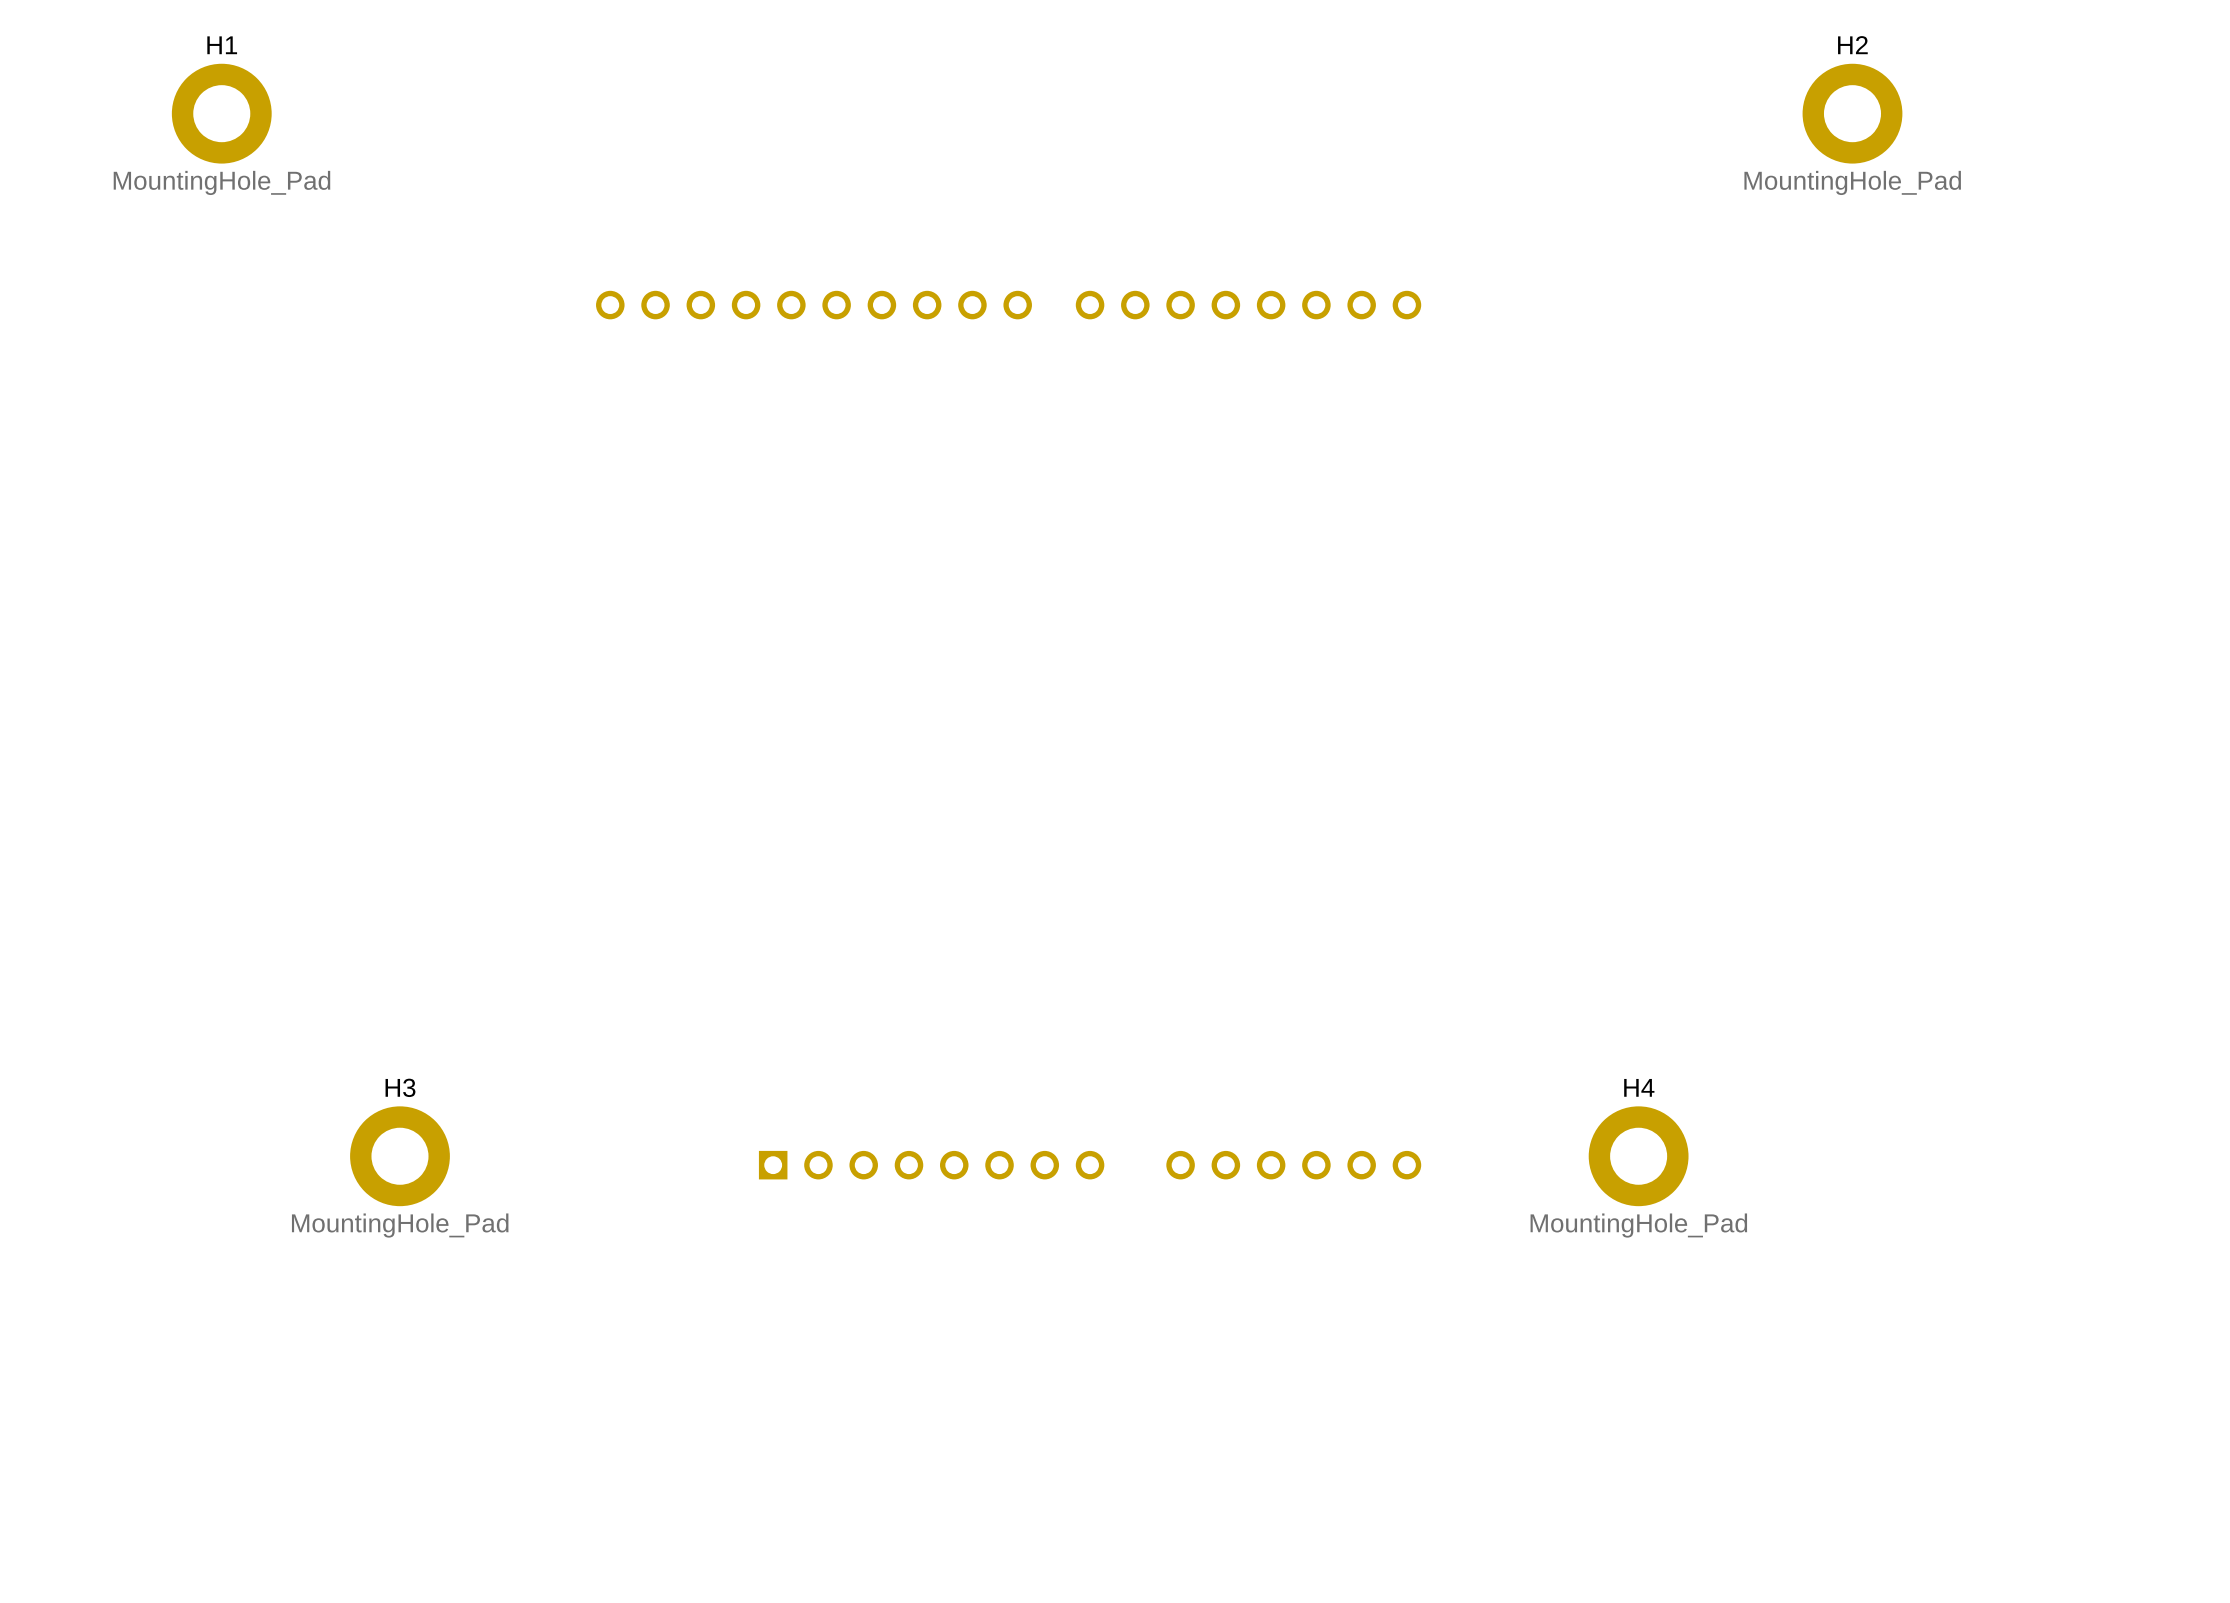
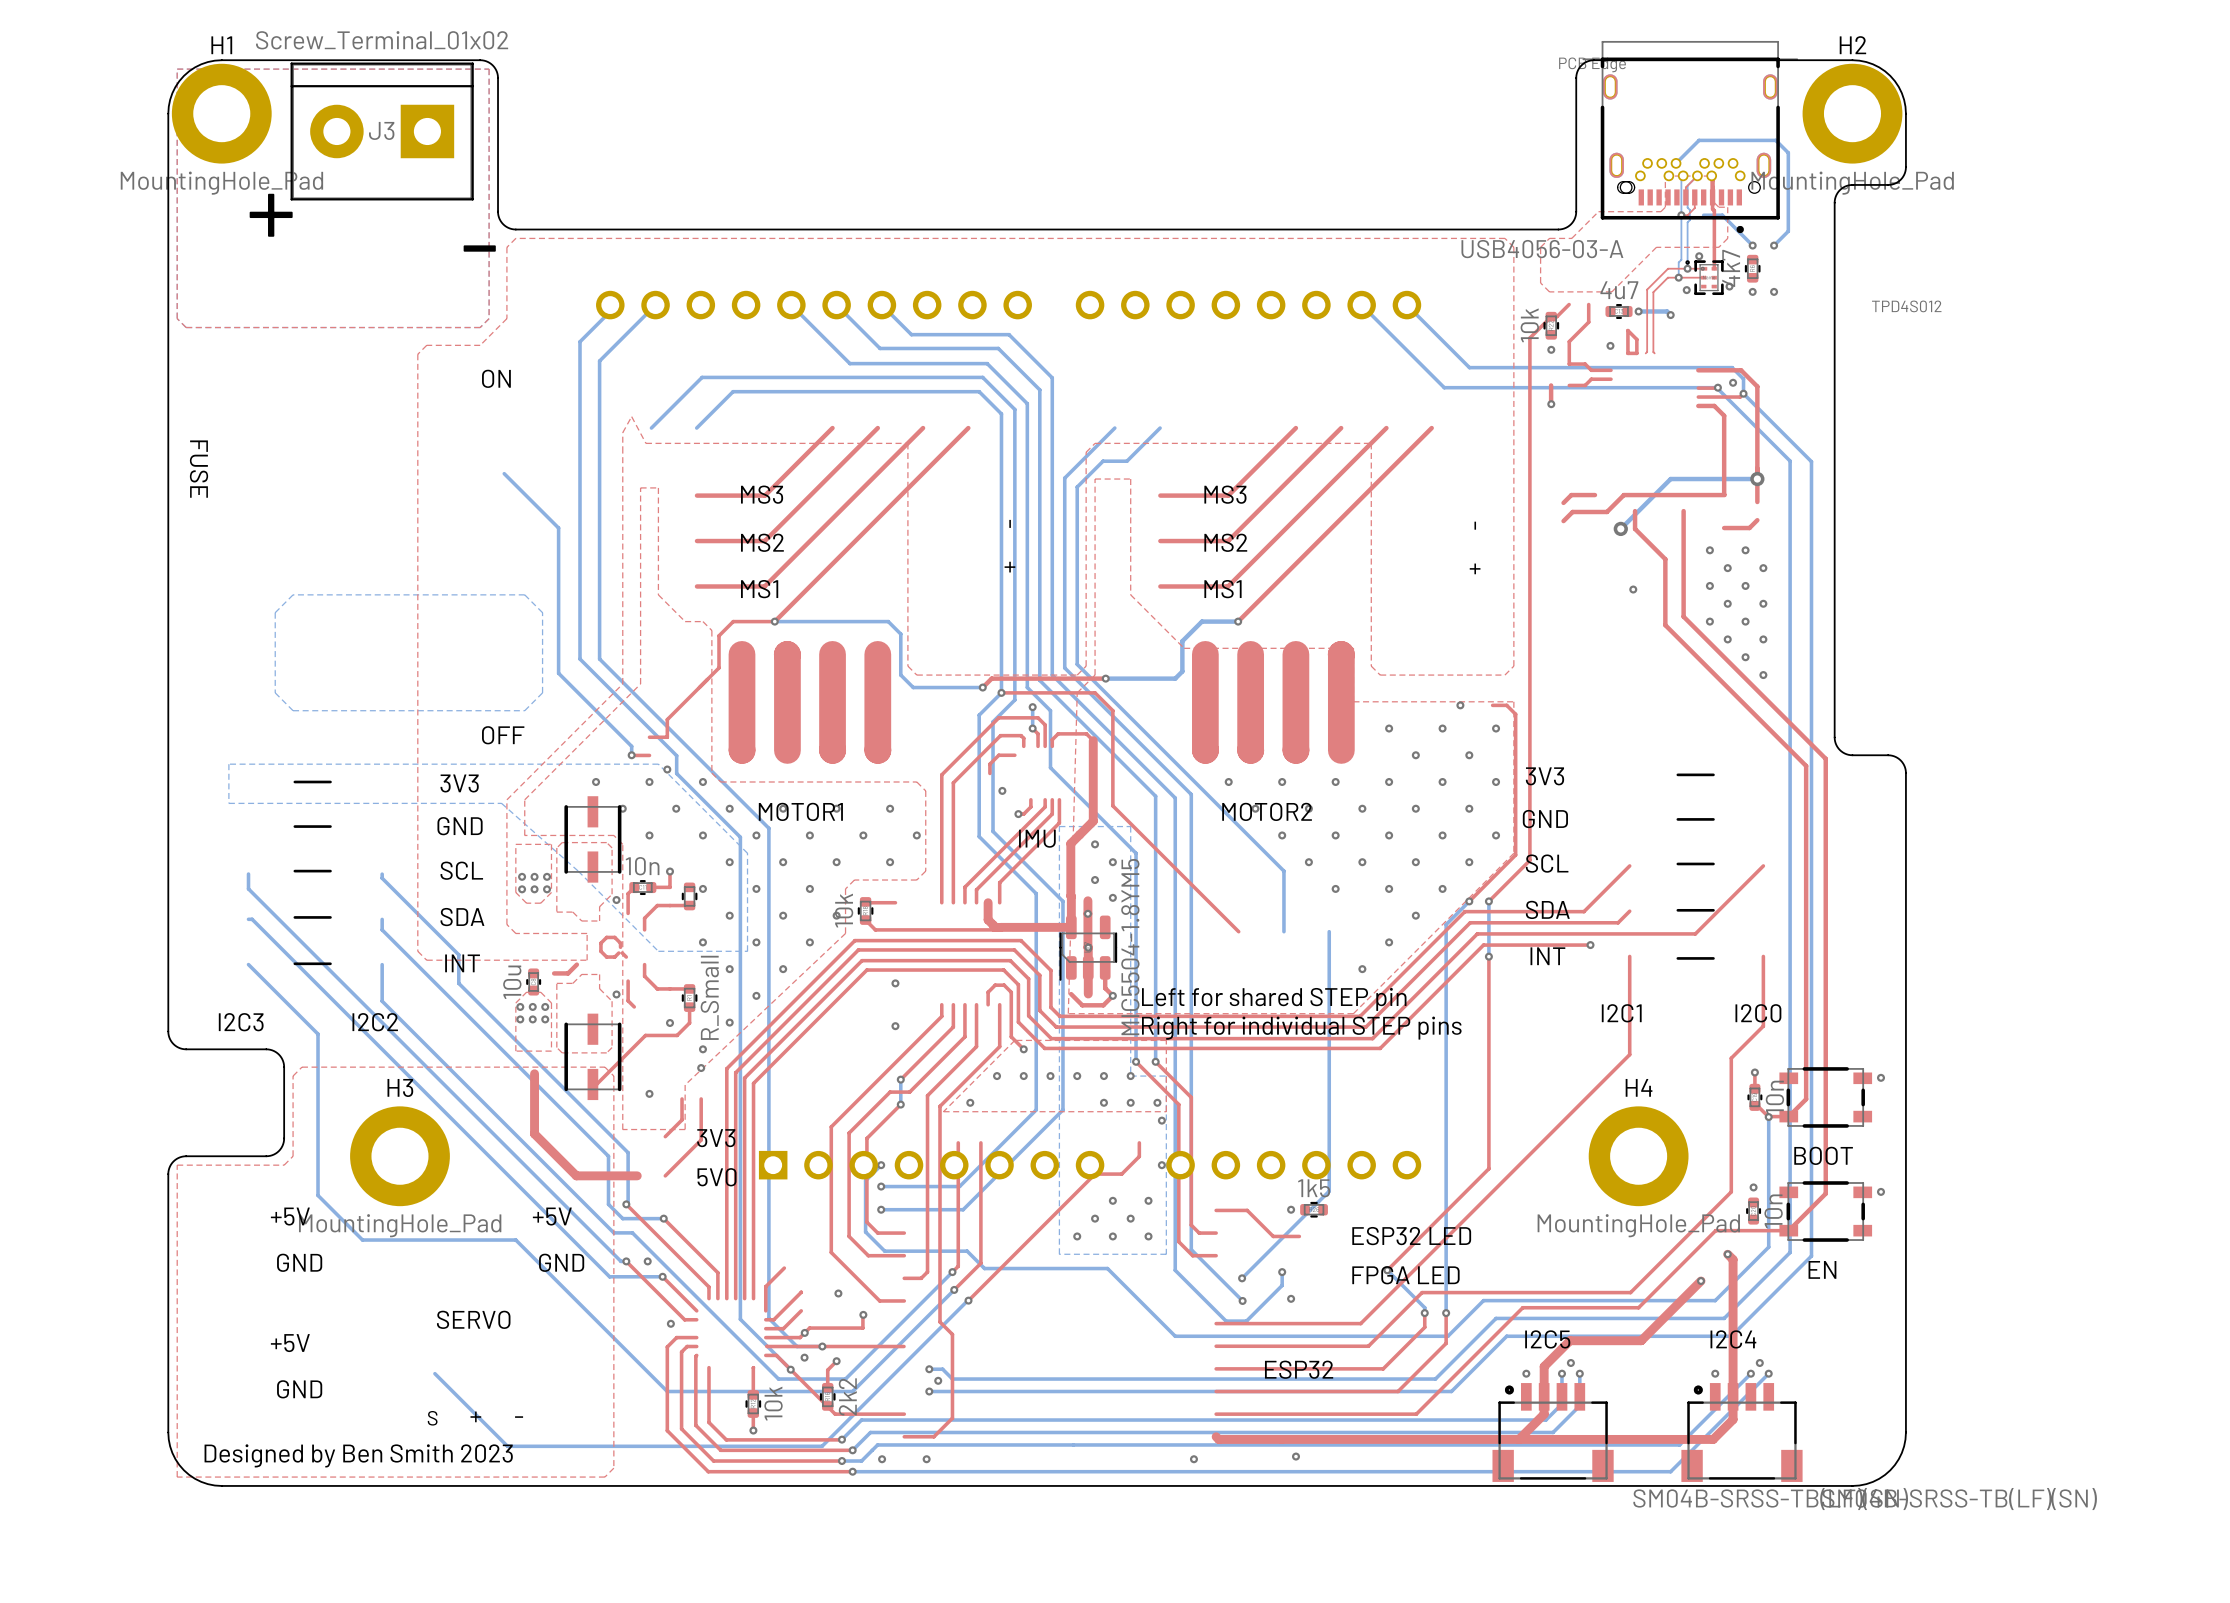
board edge: none -> (221, 60) (480, 60) (489, 62) (495, 68) (498, 78) (498, 213) (504, 225) (515, 229) (1560, 229) (1571, 224) (1576, 213) (1576, 76) (1580, 66) (1586, 61) (1594, 60) (1852, 60) (1866, 62) (1885, 71) (1898, 86) (1905, 106) (1904, 173) (1900, 179) (1892, 184) (1846, 185) (1838, 191) (1834, 200) (1834, 737) (1837, 746) (1844, 753) (1892, 755) (1902, 761) (1905, 771) (1905, 1432) (1904, 1446) (1894, 1465) (1885, 1474) (1872, 1481) (1852, 1485) (221, 1485) (201, 1481) (189, 1474) (175, 1459) (168, 1439) (168, 1170) (175, 1160) (184, 1156) (270, 1155) (280, 1149) (284, 1138) (284, 1065) (278, 1054) (268, 1049) (182, 1048) (172, 1042) (168, 1033) (168, 113) (172, 93) (183, 75) (201, 64) (221, 60)
top zone outline: none -> (177, 69) (177, 318) (186, 327) (480, 327) (489, 318) (489, 69) (177, 69)
J3: none -> Screw_Terminal_01x02 (382, 131)
part: none -> USB4056-03-A (1690, 137)
bottom track: none -> (1676, 163) (1699, 140) (1775, 140) (1788, 152) (1788, 231) (1774, 245)
bottom track: none -> (1683, 175) (1681, 177) (1681, 259) (1678, 262) (1678, 277)
top track: none -> (1697, 175) (1685, 187) (1685, 197)
bottom track: none -> (1697, 175) (1687, 185) (1689, 220) (1687, 222) (1687, 268)
top track: none -> (1711, 175) (1712, 209) (1714, 210) (1714, 268)
top zone outline: none -> (1665, 176) (1665, 207) (1660, 211) (1598, 211) (1571, 238) (1549, 238) (1540, 247) (1540, 282) (1549, 291) (1611, 291) (1656, 247) (1718, 247) (1727, 238) (1727, 207) (1718, 207) (1714, 202) (1714, 176) (1665, 176)
top track: none -> (1694, 197) (1694, 208) (1687, 215) (1681, 215)
via: none -> (1681, 215)
bottom track: none -> (1703, 215) (1722, 215) (1752, 245)
text: none -> + (271, 215)
top zone outline: none -> (515, 238) (1504, 238) (1513, 247) (1513, 666) (1504, 675) (1380, 675) (1371, 666) (1371, 443) (1095, 443) (1086, 452) (1086, 666) (1077, 675) (916, 675) (907, 666) (907, 443) (645, 443) (631, 416) (622, 432) (622, 683) (506, 799) (506, 924) (515, 933) (587, 933) (587, 960) (426, 960) (417, 951) (417, 354) (426, 345) (480, 345) (506, 318) (506, 247) (515, 238)
text: none -> - (479, 248)
via: none -> (1752, 245)
via: none -> (1774, 245)
via: none -> (1699, 256)
via: none -> (1687, 268)
top track: none -> (1704, 268) (1668, 268) (1647, 289) (1645, 353)
part: none -> 4k7 (1752, 268)
via: none -> (1678, 277)
top track: none -> (1703, 277) (1667, 277) (1653, 292) (1654, 353)
part: none -> TPD4S012 (1704, 277)
via: none -> (1729, 286)
via: none -> (1686, 290)
via: none -> (1752, 291)
via: none -> (1774, 291)
top track: none -> (1569, 304) (1556, 316) (1551, 316) (1529, 338) (1529, 860) (1488, 901)
top track: none -> (1588, 304) (1588, 322) (1569, 341) (1569, 364) (1585, 364) (1591, 370) (1610, 370)
bottom track: none -> (610, 305) (610, 311) (579, 341) (579, 659) (676, 755) (676, 773) (740, 837) (740, 1319) (790, 1369)
bottom track: none -> (655, 305) (599, 361) (599, 659) (768, 828) (768, 1318) (796, 1346) (822, 1346)
bottom track: none -> (791, 305) (849, 363) (987, 363) (1027, 403) (1027, 687) (1050, 710) (1050, 767) (1136, 853) (1136, 1061)
bottom track: none -> (836, 305) (880, 348) (998, 348) (1039, 389) (1039, 680) (1155, 796) (1155, 1061)
bottom track: none -> (881, 305) (911, 334) (1009, 334) (1052, 377) (1052, 675) (1175, 798) (1175, 1270) (1226, 1321) (1246, 1321) (1282, 1285) (1282, 1272)
bottom track: none -> (1361, 305) (1444, 387) (1717, 387) (1790, 461) (1790, 1252) (1724, 1318) (1496, 1318) (1435, 1379) (952, 1379) (942, 1369) (929, 1369)
bottom track: none -> (1406, 305) (1469, 367) (1732, 367) (1743, 378) (1743, 393) (1811, 461) (1811, 1256) (1731, 1336) (1506, 1336) (1451, 1391) (929, 1391)
part: none -> 4u7 (1619, 311)
bottom track: none -> (1638, 311) (1667, 311) (1670, 315)
via: none -> (1638, 311)
via: none -> (1670, 315)
part: none -> 10k (1551, 325)
top track: none -> (1627, 330) (1636, 339) (1636, 353) (1627, 353) (1627, 330)
via: none -> (1610, 345)
via: none -> (1551, 349)
top track: none -> (1698, 370) (1741, 370) (1757, 386) (1757, 502)
text: none -> ON (496, 378)
top track: none -> (1610, 379) (1591, 379) (1585, 385) (1569, 385)
via: none -> (1733, 382)
top track: none -> (1551, 385) (1551, 403)
top track: none -> (1717, 387) (1698, 388)
via: none -> (1717, 387)
top track: none -> (1743, 393) (1740, 397) (1698, 397)
via: none -> (1743, 393)
via: none -> (1551, 404)
top track: none -> (1698, 405) (1714, 405) (1724, 415) (1724, 494)
bottom track: none -> (651, 428) (702, 377) (982, 377) (1014, 409) (1014, 700) (993, 721) (993, 831) (1062, 901) (1062, 1109) (963, 1209) (881, 1209)
bottom track: none -> (696, 428) (733, 391) (979, 391) (1001, 413) (1001, 692) (979, 715) (979, 836) (1036, 893) (1036, 1109) (959, 1186) (881, 1186)
top track: none -> (832, 428) (764, 495) (696, 495)
top track: none -> (877, 428) (764, 541) (696, 541)
top track: none -> (923, 428) (764, 586) (696, 586)
top track: none -> (968, 428) (774, 621) (733, 621) (719, 635) (719, 667) (667, 719) (667, 737) (649, 737)
bottom track: none -> (1114, 428) (1064, 478) (1064, 667) (1191, 794) (1191, 1249) (1242, 1300)
bottom track: none -> (1160, 428) (1126, 461) (1103, 461) (1077, 487) (1077, 664) (1283, 871) (1283, 931)
top track: none -> (1295, 428) (1228, 495) (1160, 495)
top track: none -> (1341, 428) (1228, 541) (1160, 541)
top track: none -> (1386, 428) (1228, 586) (1160, 586)
top track: none -> (1431, 428) (1238, 621)
text: none -> FUSE (199, 469)
bottom track: none -> (504, 473) (558, 528) (558, 673) (631, 746) (631, 755)
top zone outline: none -> (1095, 479) (1130, 479) (1130, 594) (1184, 648) (1353, 648) (1353, 701) (1513, 701) (1513, 853) (1353, 1013) (1068, 1013) (1077, 692) (1095, 675) (1095, 479)
bottom track: none -> (1757, 479) (1670, 479) (1620, 528)
via: none -> (1757, 479)
top zone outline: none -> (640, 487) (640, 683) (524, 799) (524, 835) (613, 835) (622, 844) (622, 1129) (685, 1129) (685, 1084) (845, 933) (845, 888) (854, 880) (916, 880) (925, 871) (925, 790) (916, 781) (720, 781) (711, 773) (711, 630) (702, 621) (685, 621) (658, 594) (658, 487) (640, 487)
text: none -> MS3 (762, 494)
text: none -> MS3 (1225, 494)
top track: none -> (1594, 495) (1571, 495) (1563, 502)
top track: none -> (1724, 495) (1623, 495) (1606, 511) (1572, 511) (1563, 521)
top track: none -> (1635, 511) (1635, 528) (1665, 559) (1665, 625) (1806, 765) (1806, 1099) (1788, 1116) (1768, 1117) (1757, 1105) (1754, 1105)
top track: none -> (1683, 511) (1683, 616) (1825, 758) (1825, 1193) (1788, 1230) (1715, 1230) (1638, 1307) (1522, 1307) (1416, 1414) (1216, 1414)
top track: none -> (1757, 520) (1749, 528) (1724, 528)
text: none -> - (1010, 523)
text: none -> - (1475, 525)
via: none -> (1620, 528)
text: none -> MS2 (762, 542)
text: none -> MS2 (1225, 542)
via: none -> (1709, 550)
via: none -> (1745, 550)
text: none -> + (1009, 567)
text: none -> + (1475, 568)
via: none -> (1727, 568)
via: none -> (1763, 568)
via: none -> (1709, 585)
via: none -> (1745, 585)
text: none -> MS1 (759, 589)
text: none -> MS1 (1222, 589)
via: none -> (1633, 589)
bottom zone outline: none -> (293, 594) (524, 594) (542, 612) (542, 692) (524, 710) (293, 710) (275, 692) (275, 612) (293, 594)
via: none -> (1727, 603)
via: none -> (1763, 603)
bottom track: none -> (774, 621) (888, 621) (900, 634) (900, 675) (913, 687) (982, 687)
via: none -> (774, 621)
bottom track: none -> (1238, 621) (1201, 621) (1182, 641) (1182, 671) (1175, 678) (1105, 678)
via: none -> (1238, 621)
via: none -> (1709, 621)
via: none -> (1745, 621)
via: none -> (1727, 639)
via: none -> (1763, 639)
top track: none -> (741, 654) (741, 750)
top track: none -> (787, 654) (787, 750)
top track: none -> (832, 654) (832, 750)
top track: none -> (877, 654) (877, 750)
top track: none -> (1205, 654) (1205, 750)
top track: none -> (1250, 654) (1250, 750)
top track: none -> (1295, 654) (1295, 750)
top track: none -> (1341, 654) (1341, 750)
via: none -> (1745, 657)
via: none -> (1763, 675)
top track: none -> (1105, 678) (991, 678) (982, 687)
via: none -> (1105, 678)
via: none -> (982, 687)
top track: none -> (1001, 692) (1095, 692) (1112, 710) (1112, 805) (1238, 931)
via: none -> (1001, 692)
via: none -> (1460, 705)
top track: none -> (1492, 705) (1506, 705) (1515, 714) (1515, 855) (1469, 901)
bottom track: none -> (1032, 707) (1032, 728)
via: none -> (1032, 707)
top track: none -> (1032, 728) (1038, 733) (1038, 746)
via: none -> (1032, 728)
via: none -> (1389, 728)
via: none -> (1442, 728)
via: none -> (1496, 728)
text: none -> OFF (503, 735)
top track: none -> (1023, 746) (1023, 738) (1021, 735) (1000, 735) (953, 782) (953, 902)
top track: none -> (1045, 746) (1045, 724) (1038, 717) (998, 717) (941, 774) (941, 902)
top track: none -> (1052, 746) (1052, 739) (1058, 733) (1086, 733) (1093, 740) (1093, 821) (1070, 843) (1071, 927) (995, 927) (988, 919) (988, 902)
top track: none -> (631, 755) (649, 755)
via: none -> (631, 755)
top track: none -> (1014, 755) (998, 755) (989, 764) (989, 773)
via: none -> (1415, 755)
via: none -> (1469, 755)
bottom zone outline: none -> (228, 764) (658, 764) (747, 853) (747, 951) (658, 951) (578, 871) (501, 803) (228, 803) (228, 764)
via: none -> (667, 769)
line: none -> (1677, 774) (1713, 774)
text: none -> 3V3 (1544, 776)
line: none -> (294, 781) (330, 781)
via: none -> (596, 781)
via: none -> (649, 781)
via: none -> (702, 781)
via: none -> (1228, 781)
via: none -> (1282, 781)
via: none -> (1335, 781)
via: none -> (1389, 781)
via: none -> (1442, 781)
via: none -> (1496, 781)
text: none -> 3V3 (459, 783)
via: none -> (1002, 790)
top track: none -> (1030, 799) (1030, 806) (1023, 814) (1018, 814)
top track: none -> (1045, 799) (1045, 806) (964, 887) (964, 902)
top track: none -> (1052, 799) (1052, 814) (976, 889) (976, 902)
top track: none -> (1059, 799) (1059, 822) (999, 882) (999, 902)
via: none -> (622, 808)
via: none -> (676, 808)
via: none -> (729, 808)
via: none -> (783, 808)
via: none -> (836, 808)
via: none -> (890, 808)
via: none -> (1255, 808)
via: none -> (1308, 808)
via: none -> (1362, 808)
via: none -> (1415, 808)
via: none -> (1469, 808)
text: none -> MOTOR1 (800, 811)
text: none -> MOTOR2 (1267, 811)
via: none -> (1018, 814)
text: none -> GND (1545, 819)
line: none -> (1677, 819) (1713, 819)
line: none -> (294, 826) (330, 826)
text: none -> GND (460, 826)
bottom zone outline: none -> (1059, 826) (1130, 826) (1130, 1076) (1166, 1076) (1166, 1254) (1059, 1254) (1059, 826)
via: none -> (649, 835)
via: none -> (702, 835)
via: none -> (756, 835)
via: none -> (809, 835)
via: none -> (863, 835)
via: none -> (916, 835)
via: none -> (1282, 835)
via: none -> (1335, 835)
via: none -> (1389, 835)
via: none -> (1442, 835)
via: none -> (1496, 835)
text: none -> IMU (1037, 838)
part: none -> (592, 839)
top zone outline: none -> (562, 842) (606, 842) (612, 847) (612, 894) (599, 906) (599, 921) (581, 921) (572, 912) (556, 912) (556, 847) (562, 842)
top zone outline: none -> (515, 844) (515, 892) (526, 903) (540, 903) (551, 892) (551, 844) (515, 844)
via: none -> (1095, 844)
via: none -> (729, 862)
via: none -> (783, 862)
via: none -> (836, 862)
via: none -> (890, 862)
via: none -> (1112, 862)
via: none -> (1308, 862)
via: none -> (1362, 862)
via: none -> (1415, 862)
via: none -> (1469, 862)
text: none -> SCL (1547, 863)
line: none -> (1677, 863) (1713, 863)
top track: none -> (1629, 865) (1583, 911) (1464, 911) (1360, 1016) (1059, 1016) (1050, 1007) (1050, 970) (1021, 940) (854, 940) (726, 1068) (726, 1298)
top track: none -> (1763, 865) (1695, 933) (1477, 933) (1372, 1038) (1051, 1038) (1028, 1015) (1028, 978) (1010, 960) (862, 960) (744, 1078) (744, 1298)
text: none -> SCL (461, 870)
line: none -> (294, 871) (330, 871)
top track: none -> (669, 871) (669, 887) (651, 887)
via: none -> (669, 871)
bottom track: none -> (248, 874) (248, 888) (620, 1261) (626, 1261)
bottom track: none -> (382, 874) (382, 878) (458, 954) (458, 983) (628, 1152) (628, 1202) (626, 1204)
via: none -> (522, 876)
via: none -> (534, 876)
via: none -> (547, 876)
via: none -> (1095, 880)
top track: none -> (634, 887) (628, 893) (628, 913)
part: none -> 10n (642, 887)
via: none -> (702, 888)
via: none -> (756, 888)
via: none -> (809, 888)
via: none -> (1335, 888)
via: none -> (1389, 888)
via: none -> (1442, 888)
via: none -> (522, 889)
via: none -> (534, 889)
via: none -> (547, 889)
part: none -> (689, 896)
via: none -> (1112, 897)
via: none -> (616, 900)
top track: none -> (1087, 900) (1088, 993)
bottom track: none -> (1469, 901) (1446, 924) (1446, 1313)
via: none -> (1469, 901)
bottom track: none -> (1488, 901) (1488, 956)
via: none -> (1488, 901)
top track: none -> (868, 902) (895, 902)
top track: none -> (689, 905) (657, 905) (644, 918) (644, 929)
text: none -> SDA (1547, 909)
part: none -> 10k (865, 910)
line: none -> (1677, 910) (1713, 910)
top track: none -> (1629, 911) (1618, 922) (1470, 922) (1365, 1027) (1056, 1027) (1039, 1010) (1039, 975) (1014, 949) (858, 949) (735, 1072) (735, 1298)
via: none -> (1087, 913)
via: none -> (729, 915)
via: none -> (783, 915)
via: none -> (836, 915)
via: none -> (1415, 915)
line: none -> (294, 917) (330, 917)
text: none -> SDA (462, 917)
bottom track: none -> (248, 919) (252, 919) (609, 1276) (662, 1276)
bottom track: none -> (382, 919) (382, 929) (608, 1156) (608, 1204) (622, 1218) (663, 1218)
top track: none -> (865, 920) (875, 929) (993, 929) (993, 924)
bottom track: none -> (1329, 931) (1329, 1191) (1242, 1278)
via: none -> (702, 942)
via: none -> (756, 942)
via: none -> (809, 942)
via: none -> (1389, 942)
top track: none -> (1590, 945) (1483, 945) (1380, 1048) (1044, 1048) (1018, 1022) (1018, 984) (1003, 970) (866, 970) (753, 1083) (753, 1298)
via: none -> (1590, 945)
top track: none -> (620, 947) (620, 943) (614, 937) (606, 937) (600, 943) (600, 951) (606, 957) (614, 957) (618, 953)
via: none -> (1088, 947)
part: none -> MIC5504-1.8YM5 (1088, 948)
top track: none -> (622, 953) (626, 957)
top track: none -> (1488, 956) (1488, 1168) (1387, 1270)
via: none -> (1488, 956)
text: none -> INT (1547, 956)
top track: none -> (1629, 956) (1629, 1054) (1360, 1323) (1216, 1323)
top track: none -> (1763, 956) (1763, 1026) (1731, 1058) (1731, 1191) (1630, 1292) (1422, 1292) (1368, 1346) (1216, 1346)
line: none -> (1677, 958) (1713, 958)
line: none -> (294, 963) (330, 963)
text: none -> INT (462, 963)
bottom track: none -> (248, 964) (318, 1034) (318, 1195) (362, 1240) (515, 1240) (667, 1391) (852, 1391) (954, 1289)
bottom track: none -> (382, 964) (382, 1001) (613, 1232) (632, 1232) (778, 1379) (845, 1379) (952, 1272)
top track: none -> (576, 964) (568, 973) (554, 973)
top track: none -> (644, 964) (644, 976) (657, 988) (689, 988)
top track: none -> (1105, 967) (1105, 988) (1112, 995) (1103, 1005) (1082, 1005) (1071, 994)
via: none -> (729, 969)
via: none -> (783, 969)
via: none -> (1362, 969)
top zone outline: none -> (581, 974) (572, 983) (556, 983) (556, 1047) (562, 1052) (606, 1052) (612, 1047) (612, 1001) (599, 988) (599, 974) (581, 974)
top track: none -> (628, 981) (628, 1000) (634, 1006)
part: none -> 10u (533, 982)
via: none -> (895, 983)
top zone outline: none -> (526, 992) (515, 1002) (515, 1051) (551, 1051) (551, 1002) (540, 992) (526, 992)
via: none -> (616, 994)
via: none -> (756, 995)
via: none -> (1112, 995)
part: none -> R_Small (689, 998)
text: none -> Left for shared STEP pin (1274, 999)
top track: none -> (941, 1004) (941, 1016) (831, 1126) (831, 1252) (879, 1300) (904, 1300)
top track: none -> (953, 1004) (953, 1027) (900, 1079)
top track: none -> (964, 1004) (964, 1036) (909, 1092) (890, 1092) (849, 1133) (849, 1236) (868, 1255) (904, 1255)
top track: none -> (976, 1004) (976, 1046) (927, 1095) (927, 1272) (921, 1278) (904, 1278)
top track: none -> (988, 1004) (988, 992) (995, 985) (1004, 985) (1011, 992) (1011, 1036) (1023, 1049)
top track: none -> (999, 1004) (999, 1046) (939, 1106) (939, 1322) (952, 1334) (952, 1418) (933, 1436) (904, 1436)
via: none -> (520, 1006)
via: none -> (532, 1006)
via: none -> (545, 1006)
top track: none -> (689, 1007) (689, 1022) (677, 1035) (645, 1035) (596, 1084) (592, 1084)
text: none -> I2C1 (1621, 1013)
text: none -> I2C0 (1758, 1013)
via: none -> (520, 1019)
via: none -> (532, 1019)
via: none -> (545, 1019)
text: none -> I2C3 (241, 1022)
text: none -> I2C2 (375, 1022)
via: none -> (669, 1022)
via: none -> (729, 1022)
via: none -> (895, 1026)
text: none -> Right for individual STEP pins (1301, 1028)
top zone outline: none -> (1014, 1040) (1166, 1040) (1166, 1111) (943, 1111) (1014, 1040)
via: none -> (702, 1049)
via: none -> (1023, 1049)
part: none -> (592, 1056)
top track: none -> (1136, 1061) (1178, 1104) (1178, 1241) (1192, 1255) (1216, 1255)
via: none -> (1136, 1061)
top track: none -> (1155, 1061) (1191, 1097) (1191, 1225) (1199, 1233) (1216, 1233)
via: none -> (1155, 1061)
top zone outline: none -> (301, 1067) (293, 1076) (293, 1156) (284, 1165) (177, 1165) (177, 1477) (604, 1477) (613, 1468) (613, 1076) (604, 1067) (301, 1067)
via: none -> (701, 1068)
top track: none -> (1754, 1072) (1754, 1088)
via: none -> (1754, 1072)
top track: none -> (534, 1073) (534, 1133) (576, 1175) (637, 1175)
via: none -> (997, 1076)
via: none -> (1023, 1076)
via: none -> (1050, 1076)
via: none -> (1077, 1076)
via: none -> (1103, 1076)
via: none -> (1130, 1076)
via: none -> (1881, 1077)
bottom track: none -> (900, 1079) (900, 1104)
via: none -> (900, 1079)
via: none -> (649, 1093)
part: none -> 10n (1754, 1097)
part: none -> (1825, 1097)
top track: none -> (682, 1098) (682, 1119) (665, 1136)
top track: none -> (701, 1098) (701, 1139) (665, 1175)
via: none -> (970, 1102)
via: none -> (1103, 1102)
via: none -> (1130, 1102)
via: none -> (1157, 1102)
top track: none -> (900, 1104) (866, 1138) (866, 1222) (877, 1233) (904, 1233)
via: none -> (900, 1104)
bottom track: none -> (1768, 1117) (1768, 1247) (1715, 1300) (1483, 1300) (1447, 1336) (1175, 1336) (1107, 1268) (984, 1268) (967, 1251) (884, 1251) (865, 1232) (865, 1180) (881, 1165)
via: none -> (1768, 1117)
via: none -> (1161, 1120)
text: none -> 3V3 (716, 1138)
top track: none -> (958, 1142) (958, 1266) (952, 1272)
top track: none -> (980, 1142) (980, 1263) (954, 1289)
top track: none -> (1139, 1142) (1139, 1156) (1121, 1174) (1095, 1174) (968, 1300)
text: none -> BOOT (1823, 1155)
via: none -> (881, 1165)
via: none -> (1161, 1165)
text: none -> 5V0 (717, 1177)
via: none -> (881, 1186)
via: none -> (1753, 1187)
via: none -> (1881, 1191)
via: none -> (1112, 1200)
via: none -> (1148, 1200)
top track: none -> (626, 1204) (708, 1287) (708, 1298)
via: none -> (626, 1204)
via: none -> (881, 1209)
via: none -> (1291, 1209)
part: none -> 1k5 (1314, 1209)
top track: none -> (1216, 1210) (1247, 1210) (1273, 1236) (1299, 1236)
part: none -> 10n (1753, 1211)
part: none -> (1825, 1211)
text: none -> +5V (290, 1216)
text: none -> +5V (552, 1216)
top track: none -> (663, 1218) (717, 1272) (717, 1298)
via: none -> (663, 1218)
via: none -> (1095, 1218)
via: none -> (1130, 1218)
via: none -> (1077, 1236)
via: none -> (1112, 1236)
via: none -> (1148, 1236)
text: none -> ESP32 LED (1411, 1236)
top track: none -> (1727, 1254) (1733, 1259) (1733, 1419) (1713, 1439) (1218, 1439) (1216, 1436)
via: none -> (1727, 1254)
top track: none -> (626, 1261) (684, 1319) (696, 1319)
via: none -> (626, 1261)
via: none -> (647, 1261)
text: none -> GND (299, 1262)
text: none -> GND (561, 1262)
top track: none -> (784, 1268) (765, 1286) (765, 1310)
text: none -> EN (1822, 1269)
bottom track: none -> (1387, 1270) (1424, 1307) (1424, 1313)
via: none -> (1387, 1270)
via: none -> (952, 1272)
via: none -> (1282, 1272)
text: none -> FPGA LED (1405, 1275)
top track: none -> (662, 1276) (696, 1310)
via: none -> (662, 1276)
via: none -> (1242, 1278)
top track: none -> (1701, 1281) (1641, 1340) (1570, 1340) (1544, 1366) (1544, 1414) (1518, 1439)
via: none -> (1701, 1281)
via: none -> (954, 1289)
top track: none -> (801, 1292) (773, 1319) (765, 1319)
via: none -> (838, 1293)
via: none -> (1291, 1298)
bottom track: none -> (968, 1300) (822, 1446) (507, 1446) (434, 1373)
via: none -> (968, 1300)
via: none -> (1242, 1300)
top track: none -> (801, 1310) (783, 1328) (765, 1328)
top track: none -> (1424, 1313) (1424, 1327) (1383, 1368) (1216, 1368)
via: none -> (1424, 1313)
top track: none -> (1446, 1313) (1446, 1343) (1398, 1391) (1216, 1391)
via: none -> (1446, 1313)
top track: none -> (863, 1314) (862, 1328) (809, 1328) (800, 1337) (765, 1337)
via: none -> (863, 1314)
text: none -> SERVO (473, 1319)
via: none -> (670, 1323)
via: none -> (804, 1332)
top track: none -> (696, 1337) (676, 1337) (667, 1346) (667, 1430) (708, 1471) (852, 1471)
text: none -> I2C5 (1547, 1339)
text: none -> I2C4 (1733, 1339)
text: none -> +5V (290, 1343)
top track: none -> (696, 1346) (687, 1346) (681, 1352) (681, 1428) (713, 1461) (841, 1461)
top track: none -> (766, 1346) (903, 1346)
via: none -> (822, 1346)
top track: none -> (696, 1355) (695, 1425) (720, 1450) (852, 1450)
top track: none -> (765, 1355) (776, 1355) (835, 1414) (904, 1414)
via: none -> (804, 1357)
top track: none -> (836, 1361) (827, 1370) (827, 1387)
via: none -> (836, 1361)
via: none -> (1570, 1362)
via: none -> (1759, 1362)
top track: none -> (708, 1367) (708, 1422) (726, 1439) (841, 1439)
top track: none -> (753, 1367) (753, 1394)
via: none -> (790, 1369)
via: none -> (929, 1369)
text: none -> ESP32 (1299, 1369)
via: none -> (1526, 1373)
bottom track: none -> (1561, 1373) (1561, 1403) (1545, 1420) (861, 1420) (841, 1439)
via: none -> (1561, 1373)
bottom track: none -> (1579, 1373) (1579, 1405) (1553, 1432) (870, 1432) (852, 1450)
via: none -> (1579, 1373)
via: none -> (1715, 1373)
bottom track: none -> (1750, 1373) (1679, 1444) (877, 1444) (861, 1461) (841, 1461)
via: none -> (1750, 1373)
bottom track: none -> (1768, 1373) (1670, 1471) (852, 1471)
via: none -> (1768, 1373)
via: none -> (938, 1380)
text: none -> GND (299, 1389)
via: none -> (929, 1391)
part: none -> 2k2 (827, 1396)
part: none -> 10k (753, 1403)
top track: none -> (753, 1413) (753, 1430)
text: none -> + (475, 1416)
text: none -> S (432, 1418)
text: none -> - (519, 1417)
via: none -> (753, 1430)
part: none -> SM04B-SRSS-TB(LF)(SN) (1553, 1432)
part: none -> SM04B-SRSS-TB(LF)(SN) (1741, 1432)
via: none -> (841, 1439)
via: none -> (852, 1450)
text: none -> Designed by Ben Smith 2023 (358, 1455)
via: none -> (1295, 1456)
via: none -> (882, 1459)
via: none -> (926, 1459)
via: none -> (1193, 1459)
via: none -> (841, 1461)
via: none -> (852, 1471)

